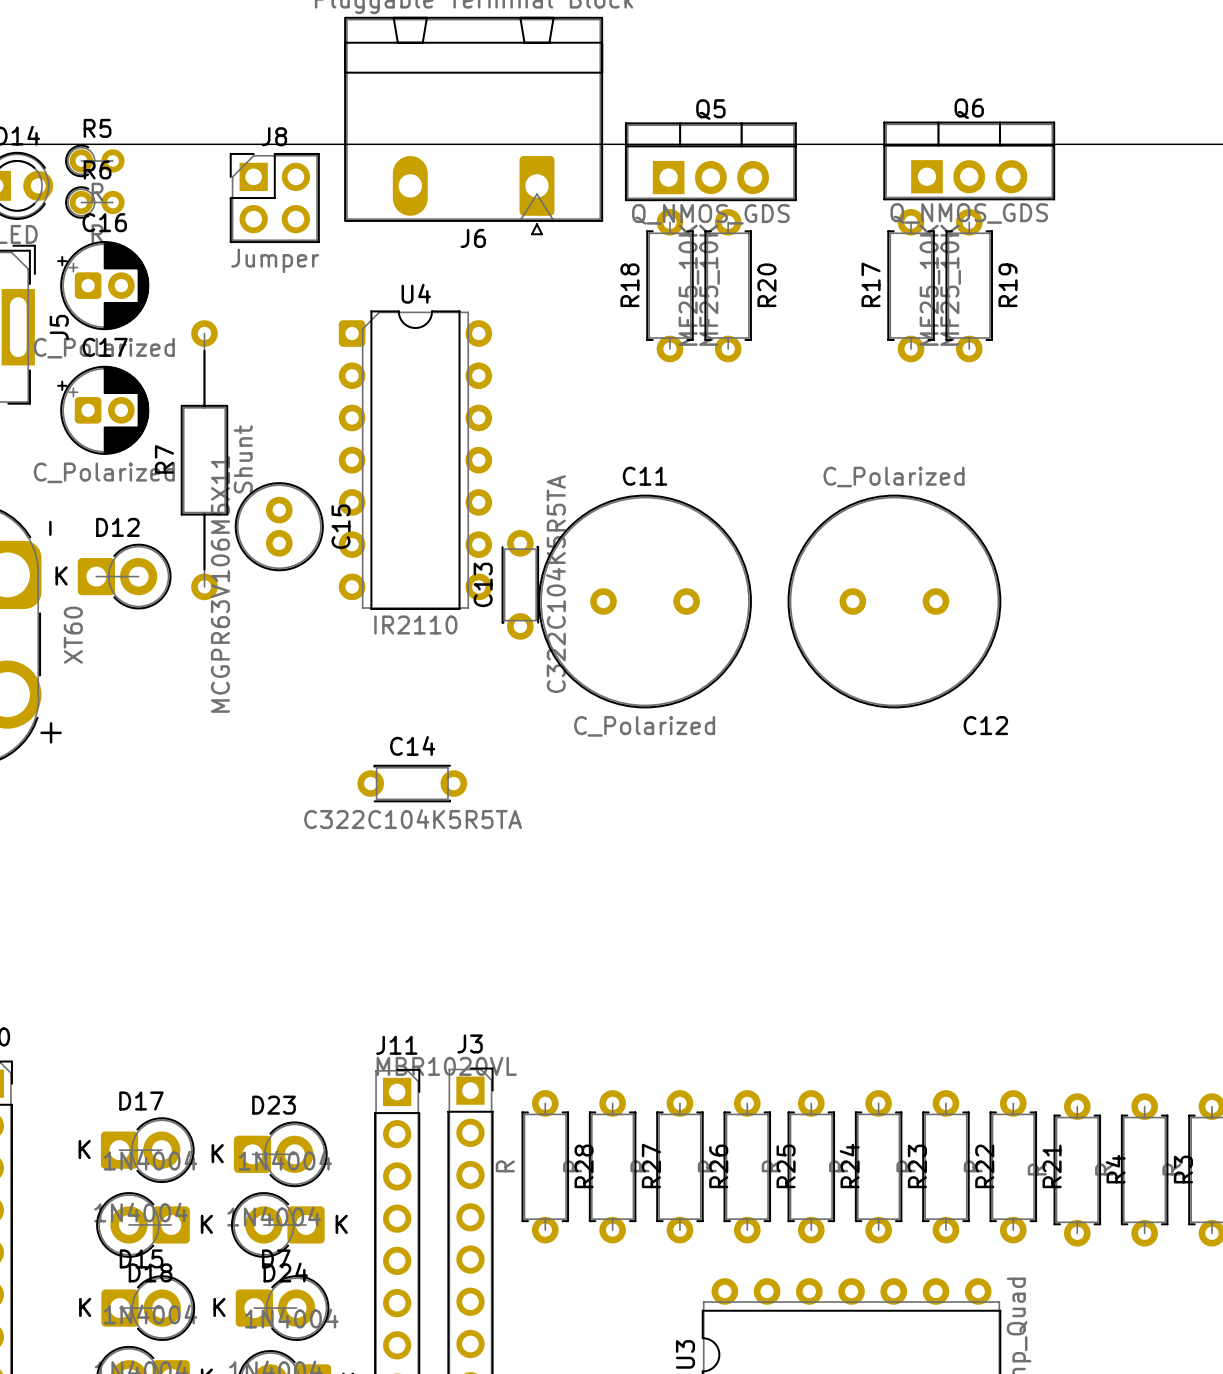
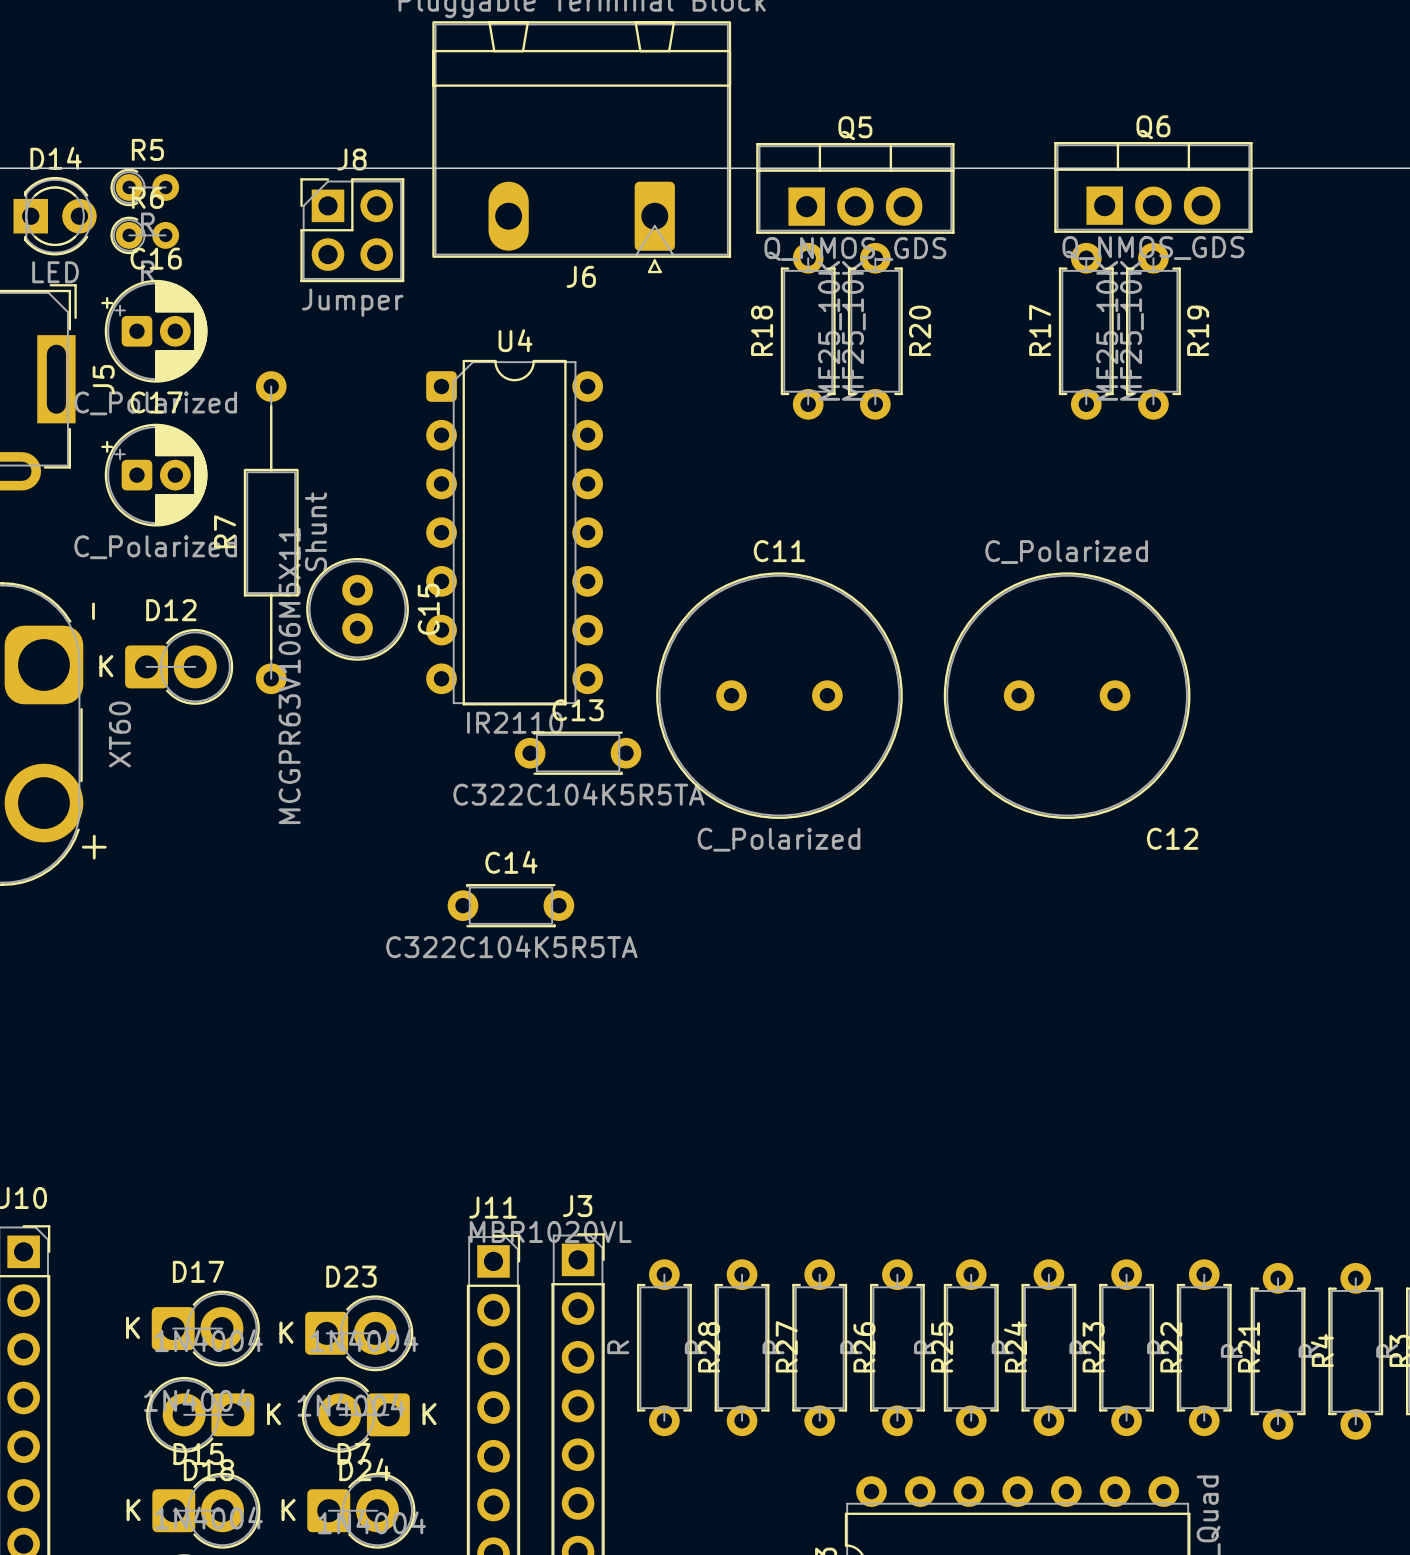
C13 rotation: 0° (520, 584) -> 90° clockwise (578, 753)
C13 position: (520, 584) -> (578, 753)

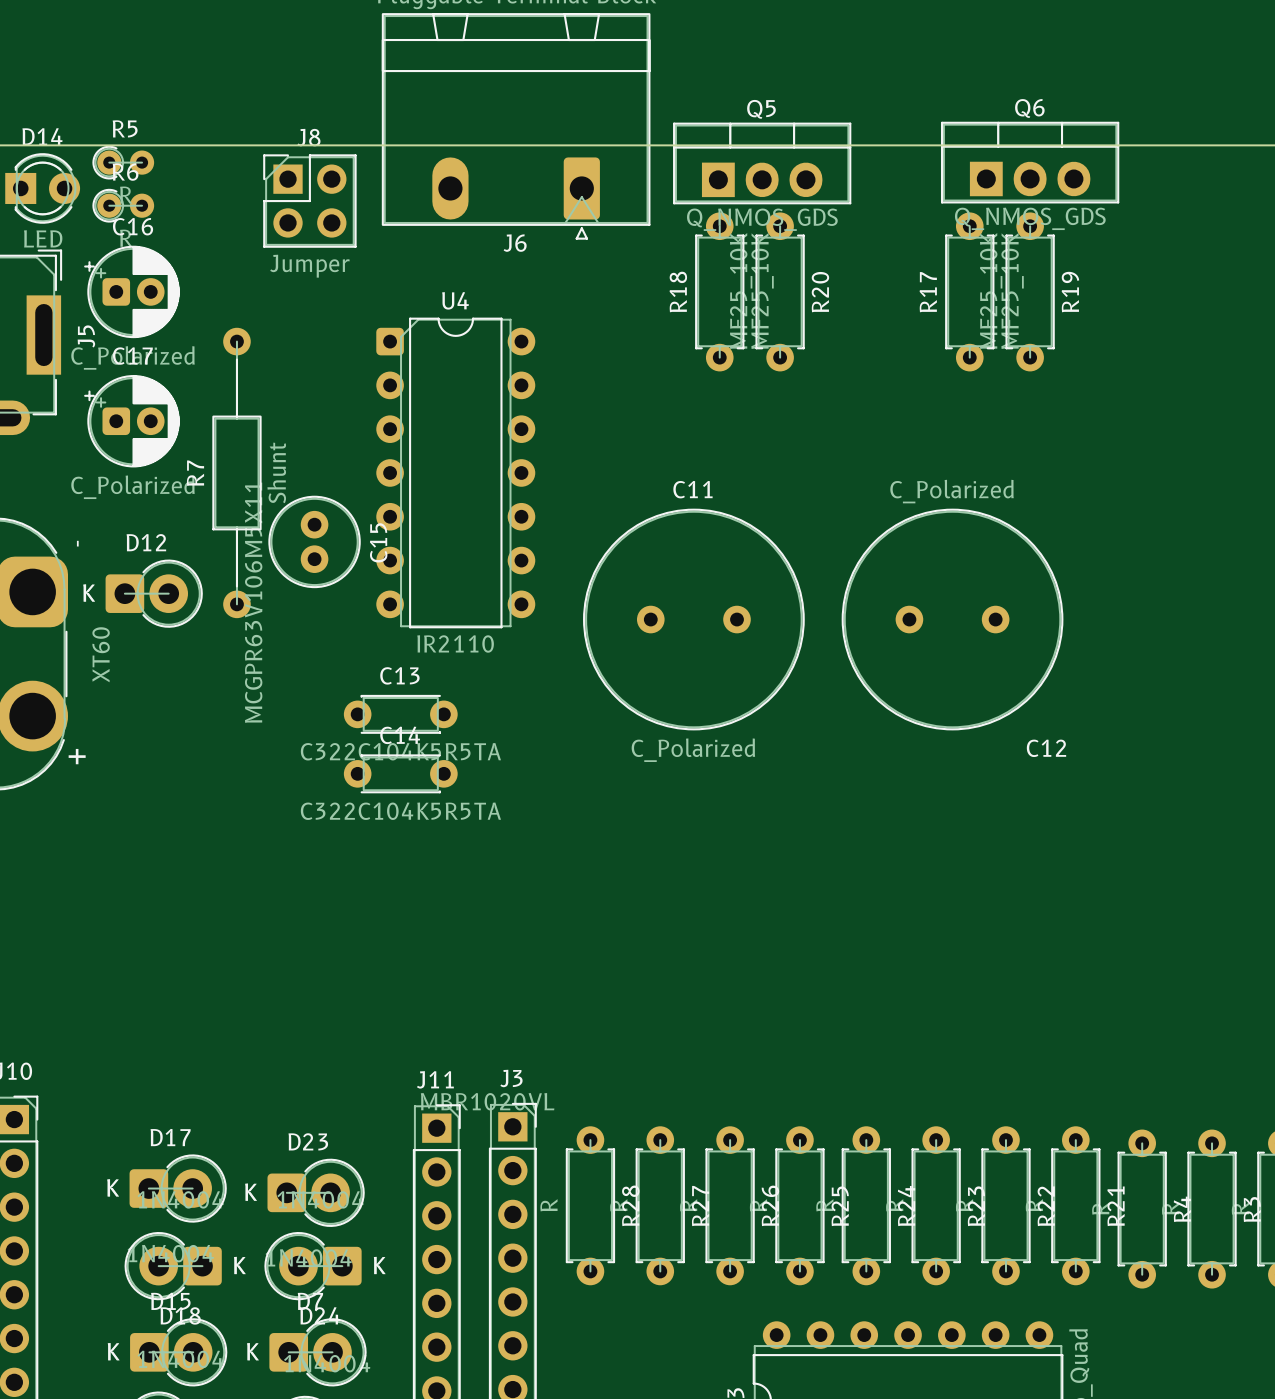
C13 position: (578, 753) -> (400, 714)
C14 position: (510, 905) -> (400, 773)

